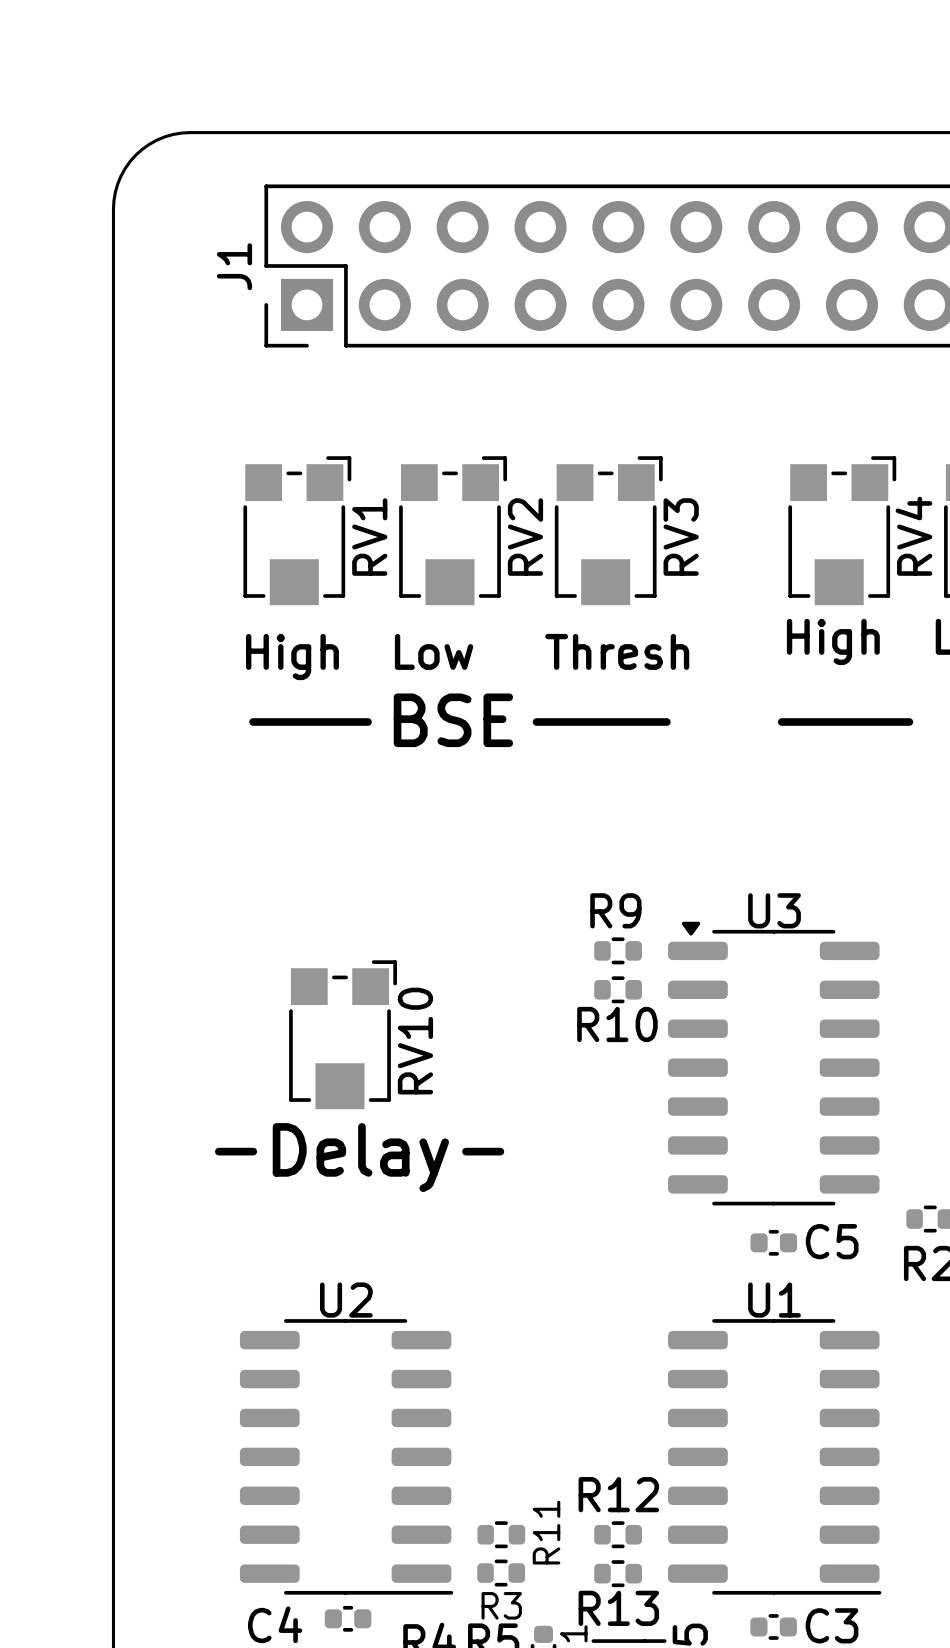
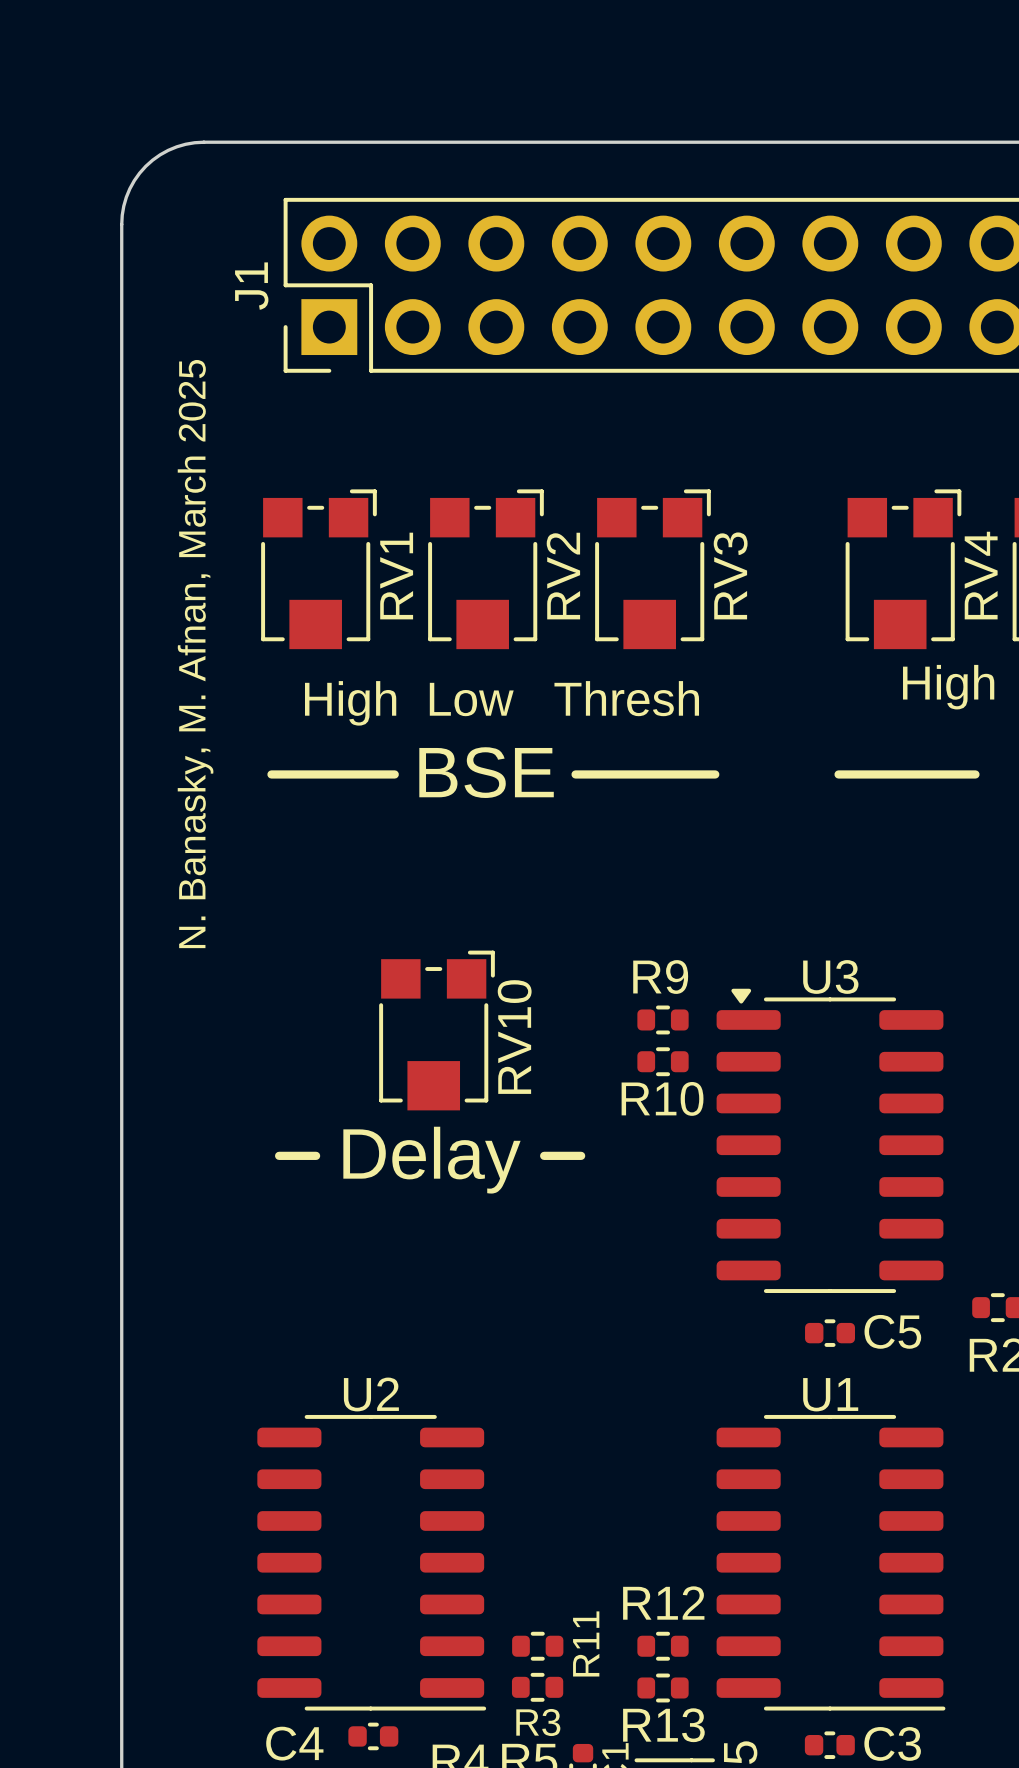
text: none -> N. Banasky, M. Afnan, March 2025 (195, 654)
RV10 position: (343, 1034) -> (437, 1030)
line: (218, 1151) (253, 1151) -> (279, 1155) (316, 1155)
line: (465, 1151) (500, 1151) -> (544, 1155) (581, 1155)
text position: Delay (360, 1157) -> Delay (431, 1160)

